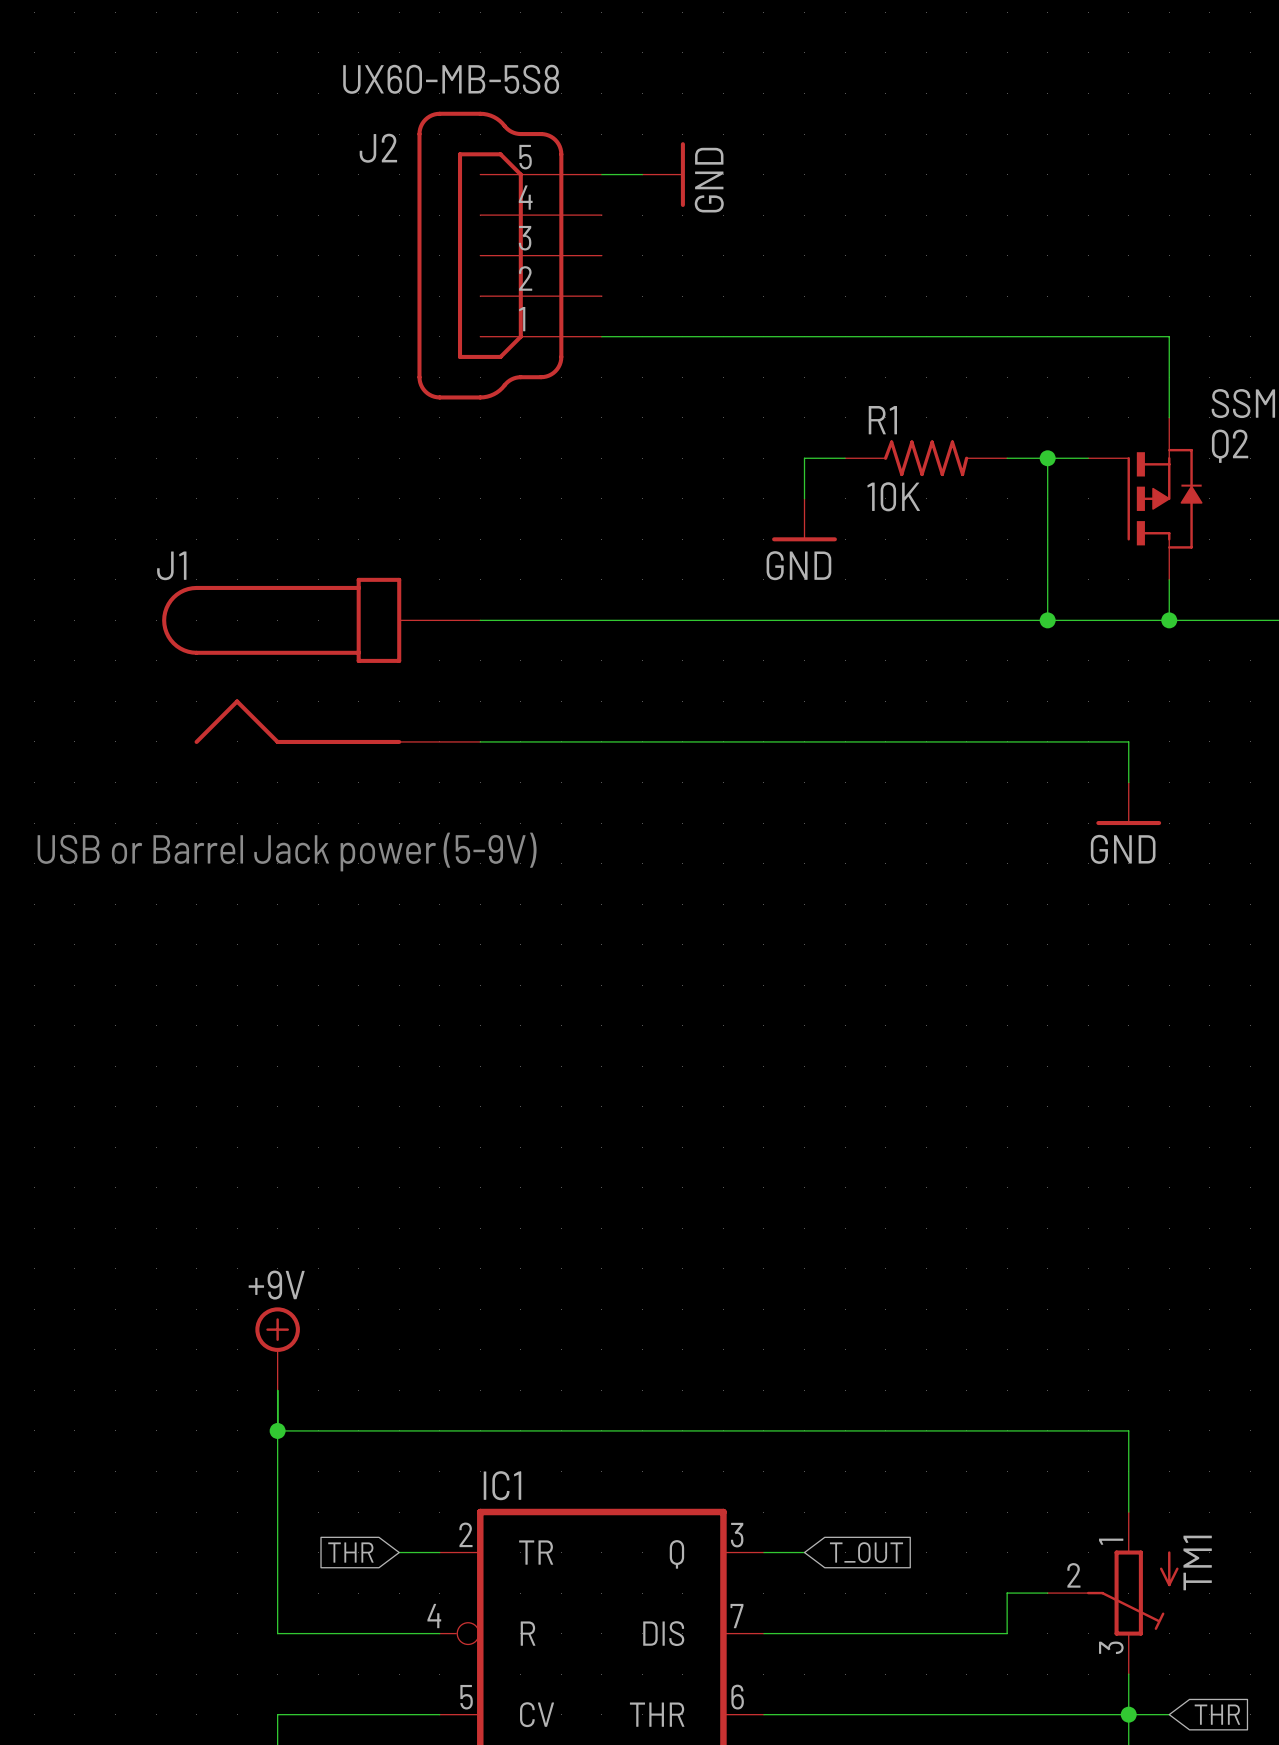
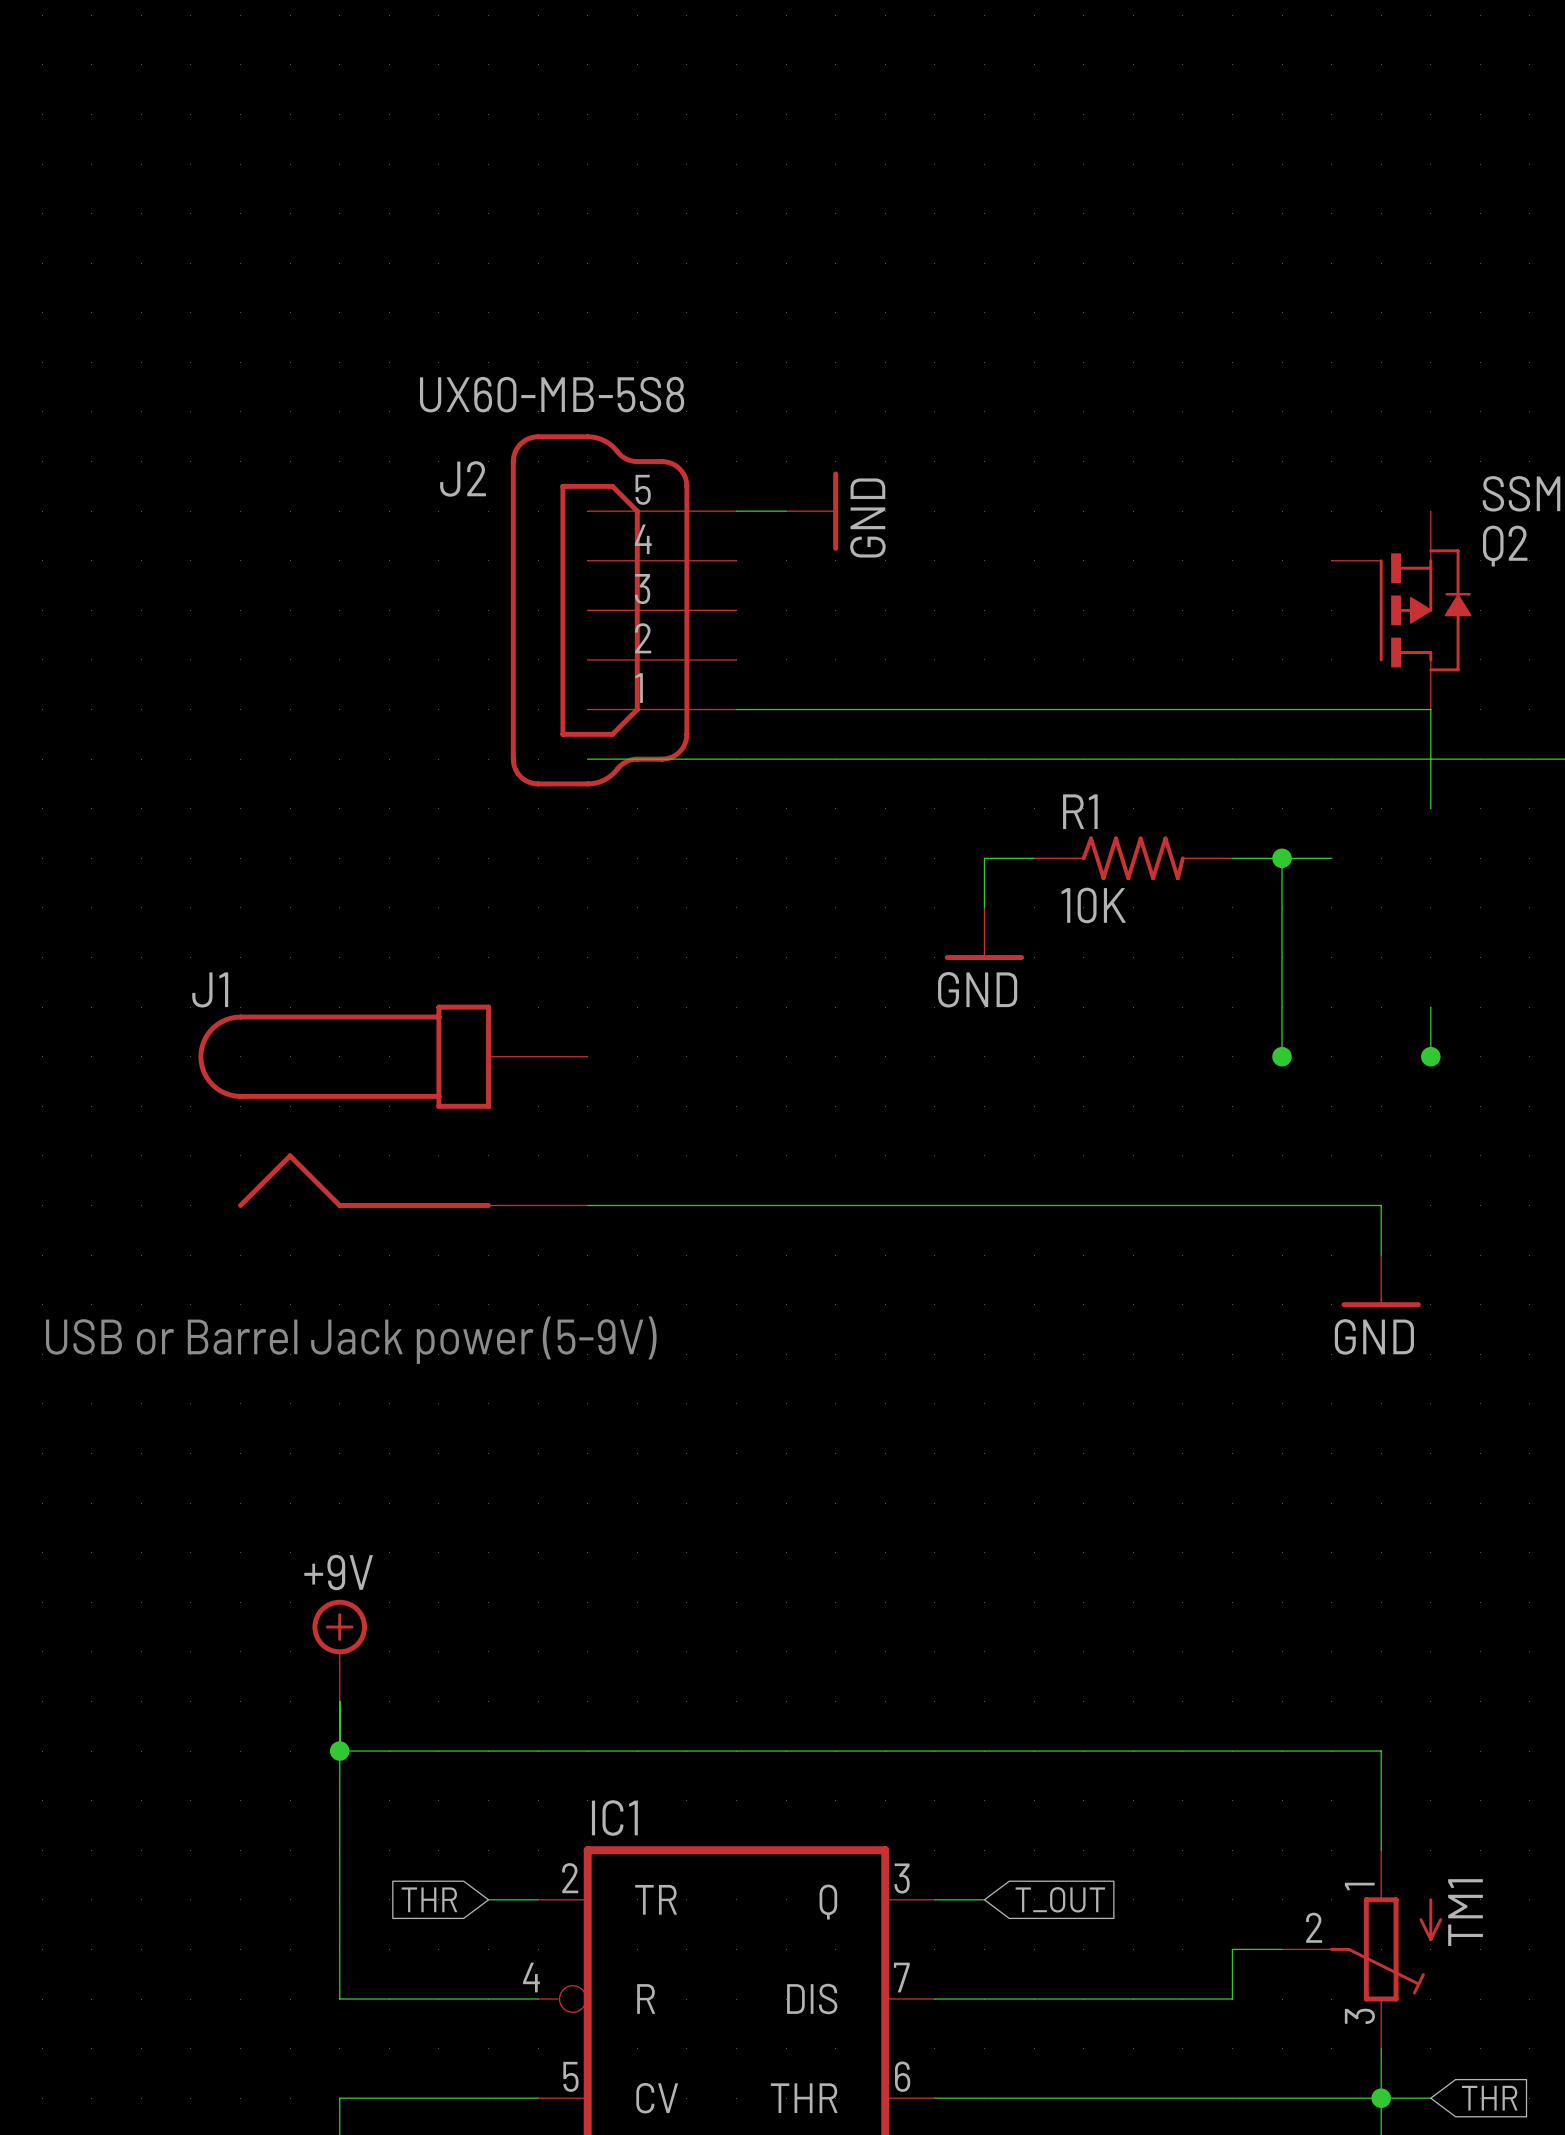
wire: (601, 174) (642, 174) -> (736, 511) (786, 511)
power symbol: GND (663, 174) -> none
J2 position: (509, 255) -> (623, 610)
wire: (601, 336) (1169, 336) (1169, 417) -> none
power symbol: none -> GND (812, 511)
wire: (845, 458) (804, 458) (804, 498) -> (1034, 858) (984, 858) (984, 907)
R1 position: (926, 458) -> (1133, 858)
wire: (1007, 458) (1088, 458) -> (1232, 858) (1331, 858)
wire: (1047, 458) (1047, 620) -> (1282, 858) (1282, 1056)
junction: (1047, 458) -> none
power symbol: GND (804, 520) -> none
wire: none -> (736, 709) (1430, 709)
junction: (1047, 620) -> none
wire: none -> (1430, 759) (1430, 808)
junction: (1169, 620) -> none
J1 position: (321, 660) -> (393, 1106)
junction: none -> (1282, 858)
wire: (480, 741) (1128, 741) (1128, 782) -> (587, 1205) (1381, 1205) (1381, 1255)
power symbol: none -> GND (984, 933)
power symbol: GND (1128, 803) -> none
wire: none -> (1430, 1007) (1430, 1056)
text position: USB or Barrel Jack power (5-9V) (287, 852) -> USB or Barrel Jack power (5-9V) (351, 1340)
junction: none -> (1282, 1056)
junction: none -> (1430, 1056)
power symbol: none -> GND (1381, 1281)

